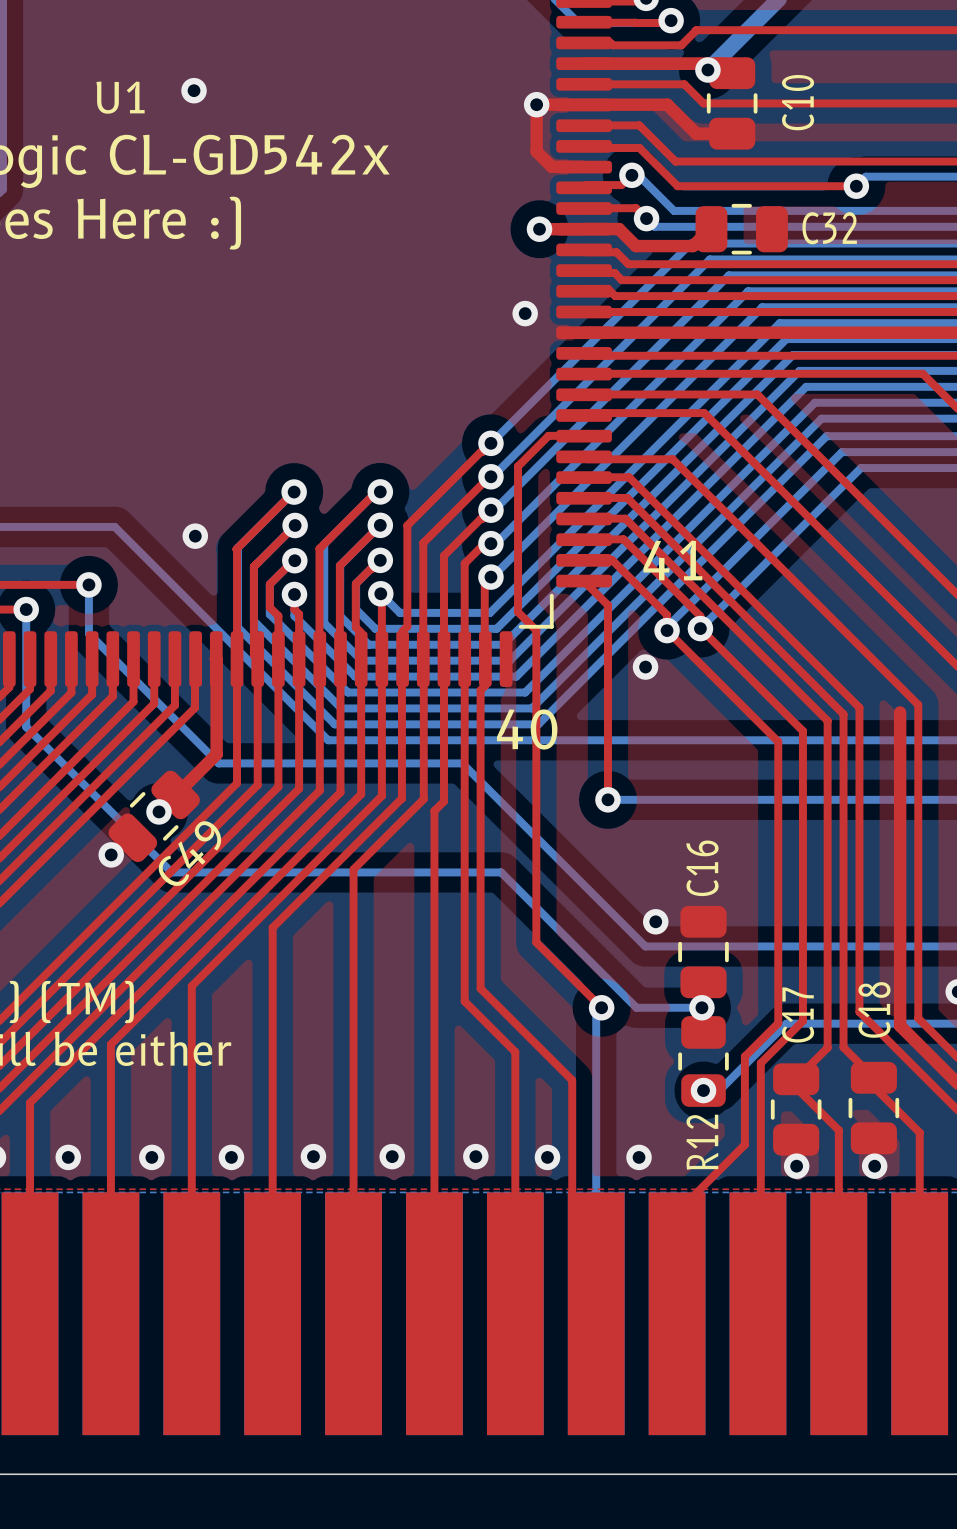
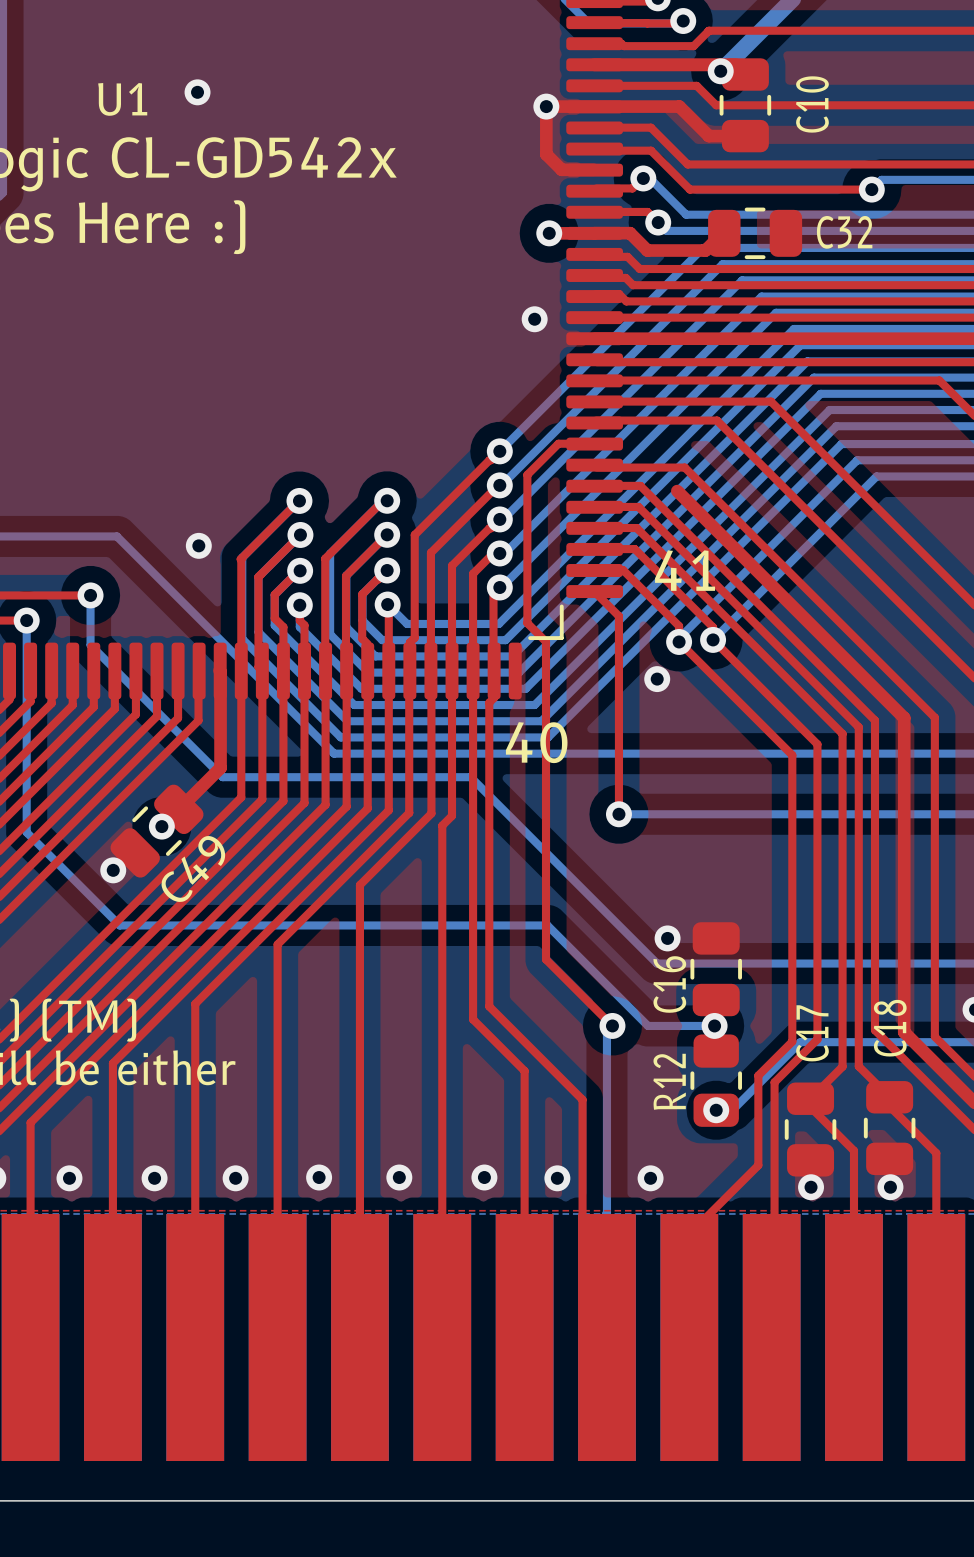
top track: (900, 712) (900, 1025) -> (677, 491) (904, 717) (904, 1032) (916, 1044)
bottom track: (26, 726) (171, 872) (501, 872) (537, 909) -> (26, 740) (26, 832) (119, 925) (547, 925)
C16 name position: C16 (702, 868) -> C16 (669, 984)
R12 name position: R12 (702, 1142) -> R12 (669, 1081)

